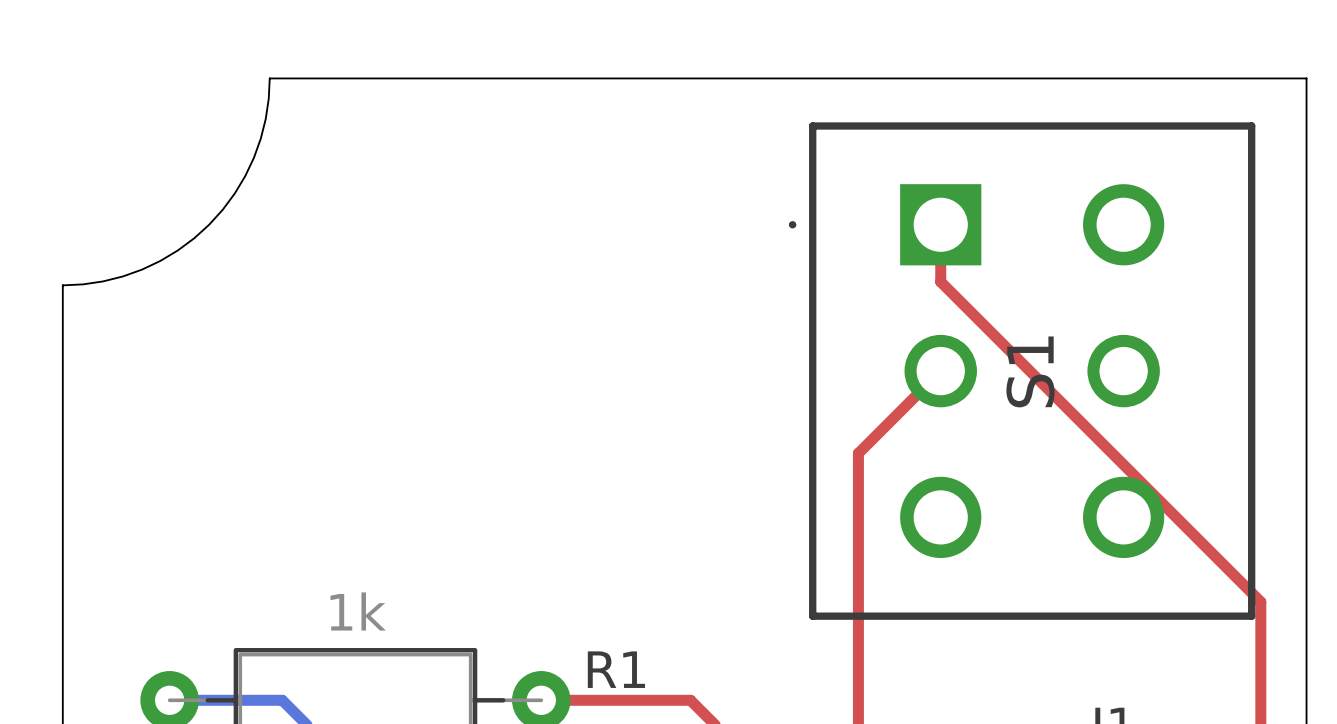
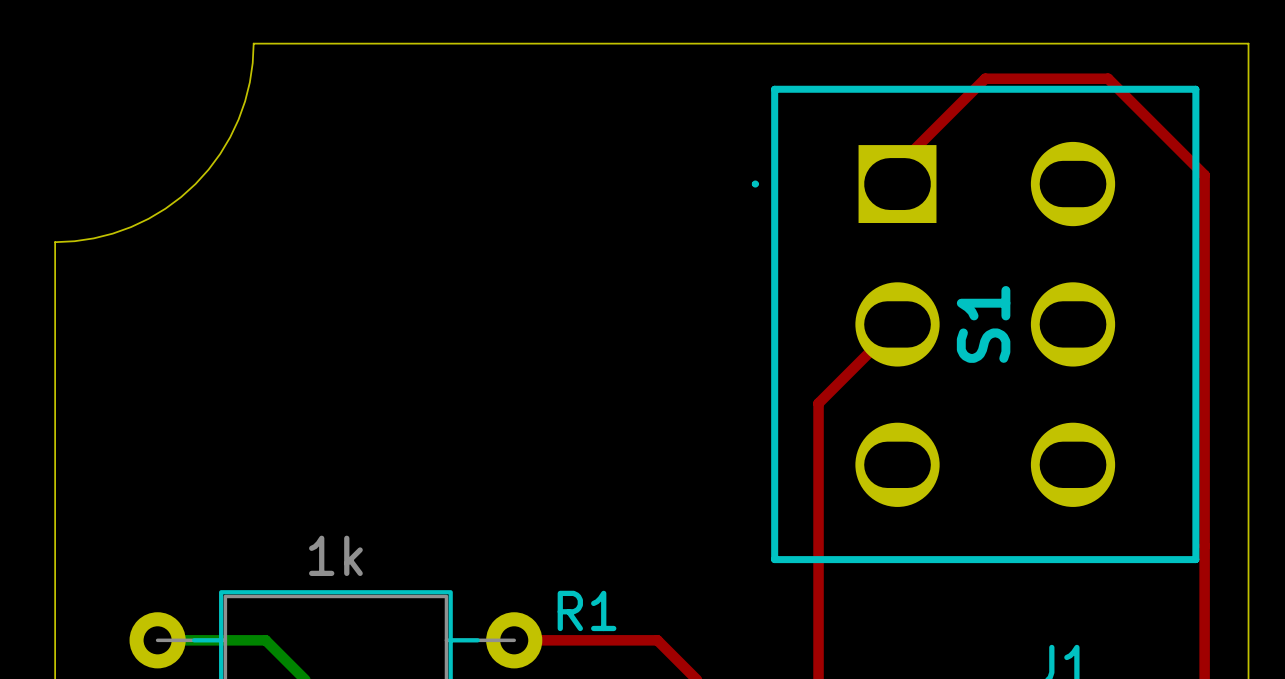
S1 footprint: [788, 122, 1256, 620] -> [751, 85, 1200, 564]
top track: (940, 224) (940, 281) (1260, 601) -> (897, 184) (897, 166) (985, 78) (1108, 78) (1204, 175) (1204, 545)

